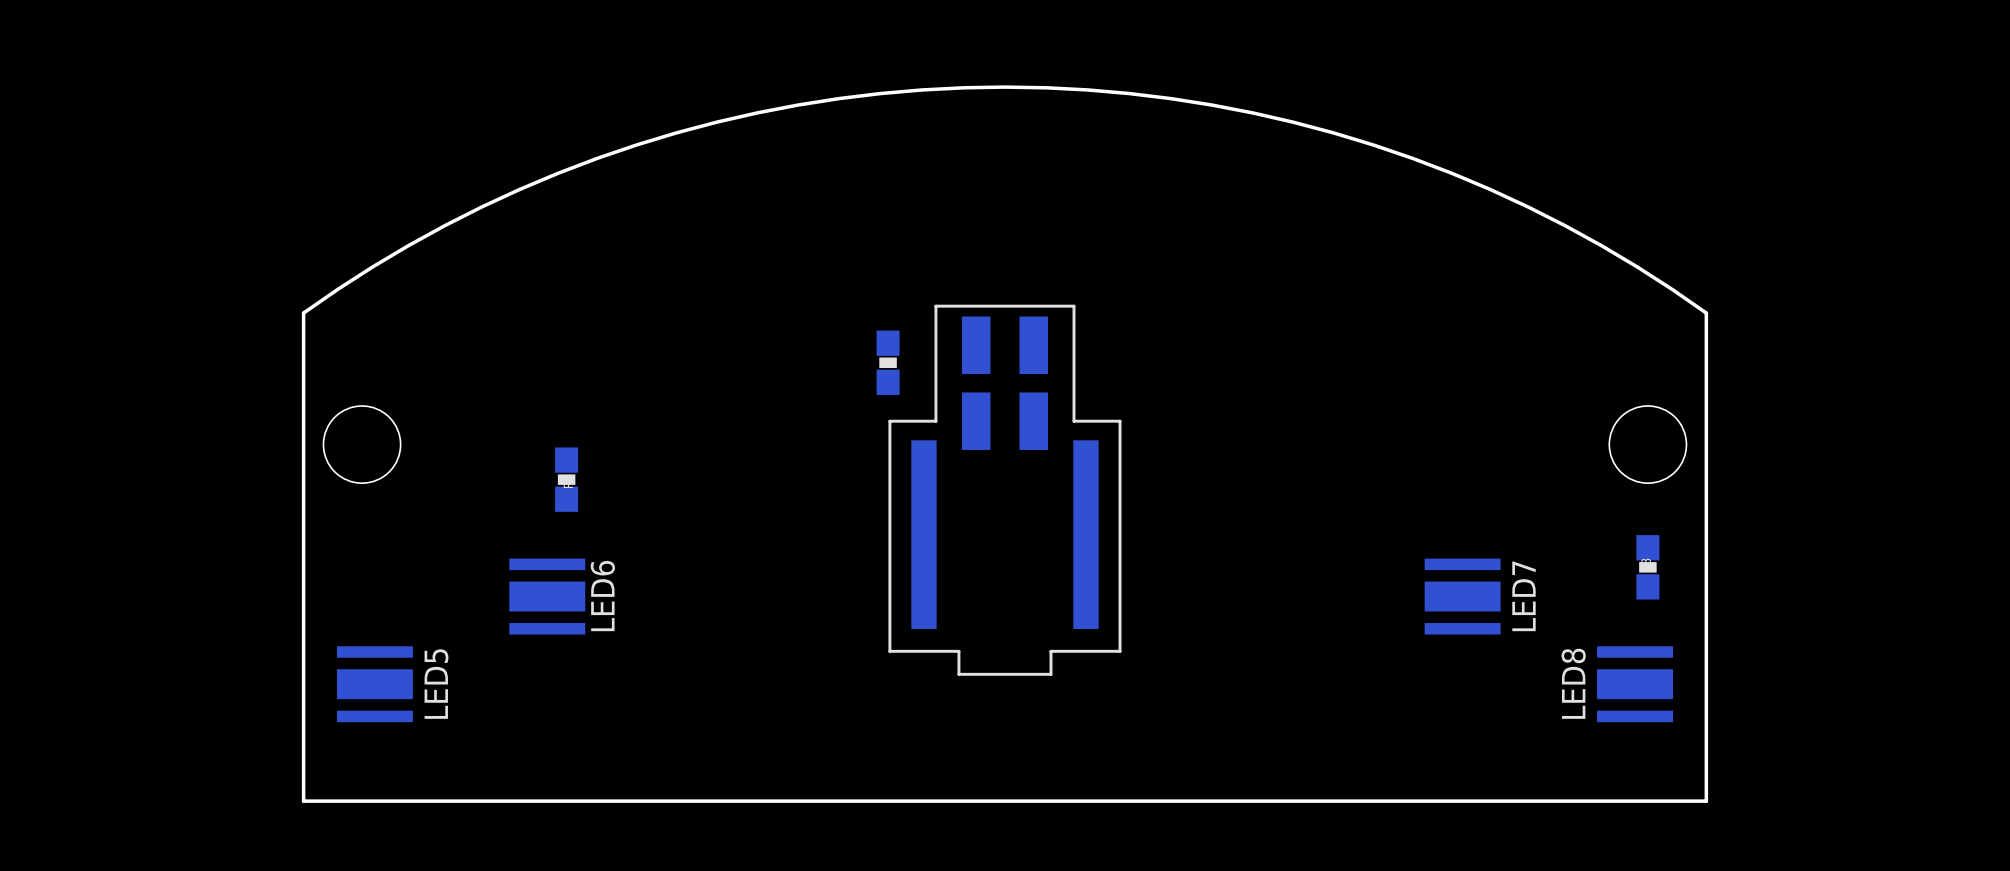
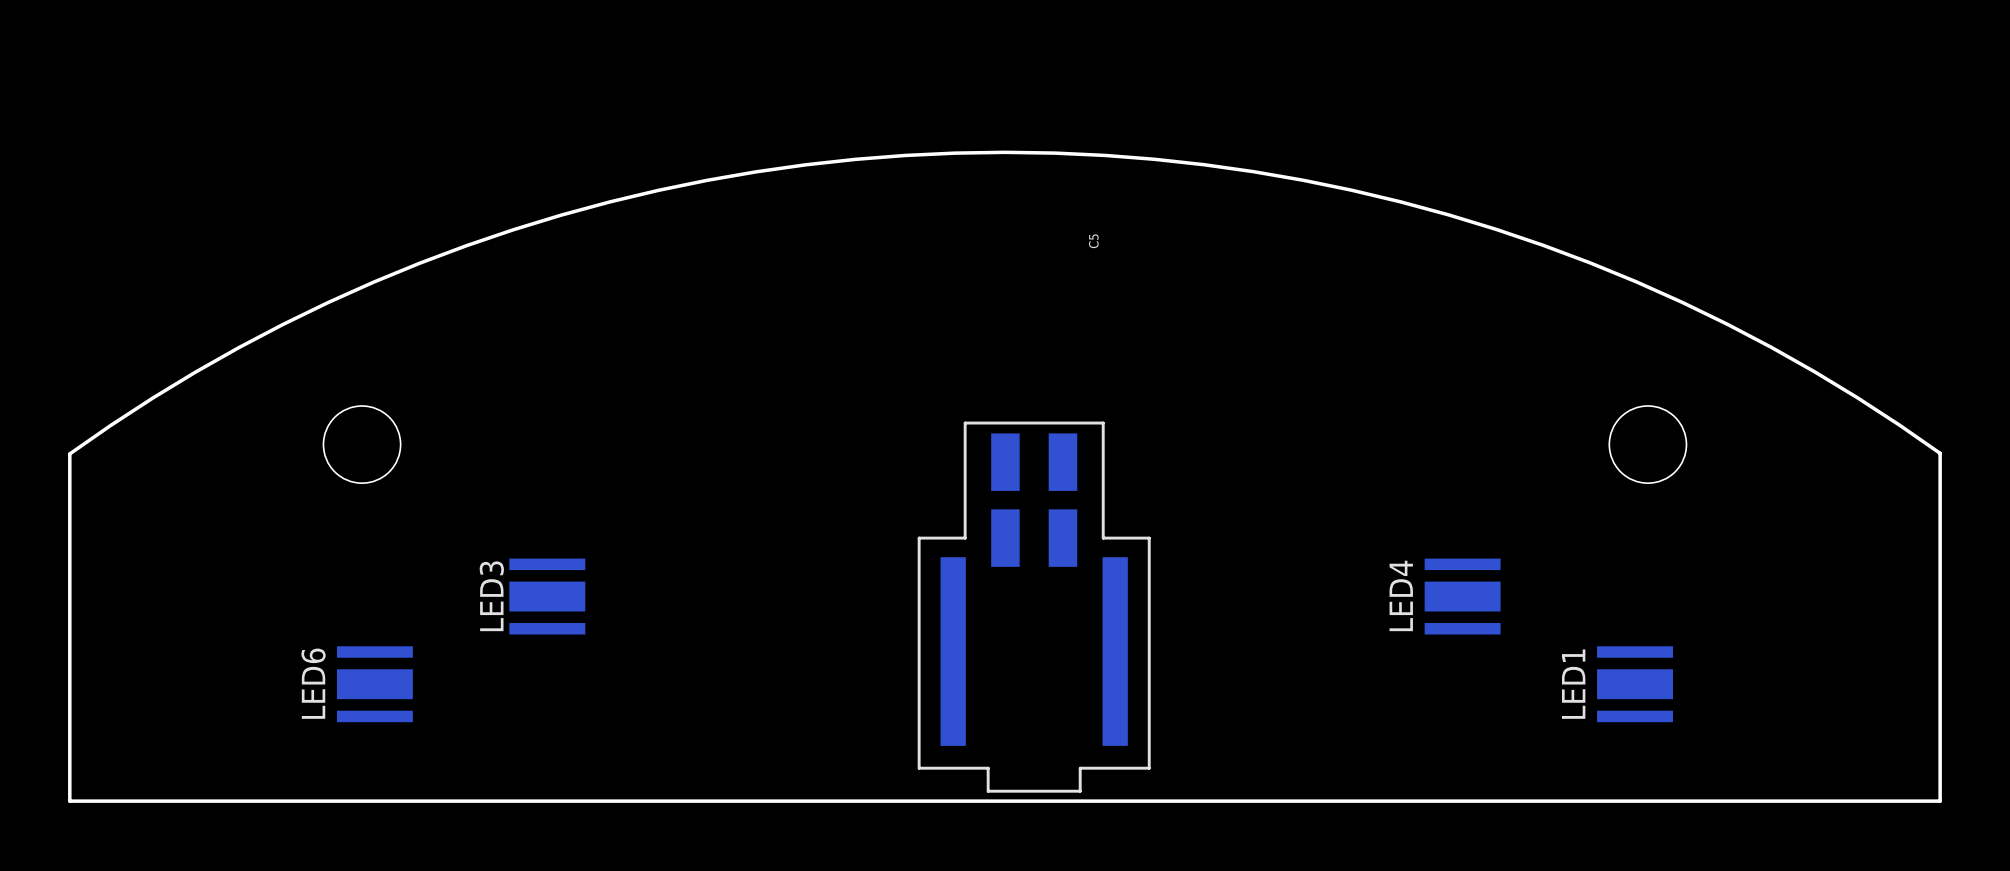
C5: none -> (1093, 241)
part: (888, 362) -> none
part: (566, 479) -> none
part position: (1004, 490) -> (1034, 607)
part: (1647, 567) -> none
LED6 name: LED6 (602, 596) -> LED3 (491, 596)
LED7 name: LED7 (1523, 596) -> LED4 (1401, 595)
LED8 name: LED8 (1573, 683) -> LED1 (1573, 684)
LED5 name: LED5 (436, 684) -> LED6 (313, 683)
board edge: (1706, 801) (1706, 313) (1637, 266) (1527, 206) (1451, 173) (1373, 144) (1293, 122) (1211, 105) (1088, 89) (1004, 87) (921, 89) (797, 105) (716, 122) (636, 144) (558, 173) (482, 206) (372, 266) (303, 313) (303, 801) -> (1706, 801) (1940, 801) (1940, 453) (1899, 424) (1814, 371) (1726, 324) (1636, 281) (1543, 245) (1496, 229) (1400, 201) (1351, 190) (1253, 171) (1204, 164) (1104, 155) (1004, 152) (954, 153) (855, 159) (756, 171) (658, 190) (561, 215) (513, 229) (466, 245) (373, 282) (282, 324) (238, 347) (152, 398) (69, 453) (69, 801) (303, 801)

